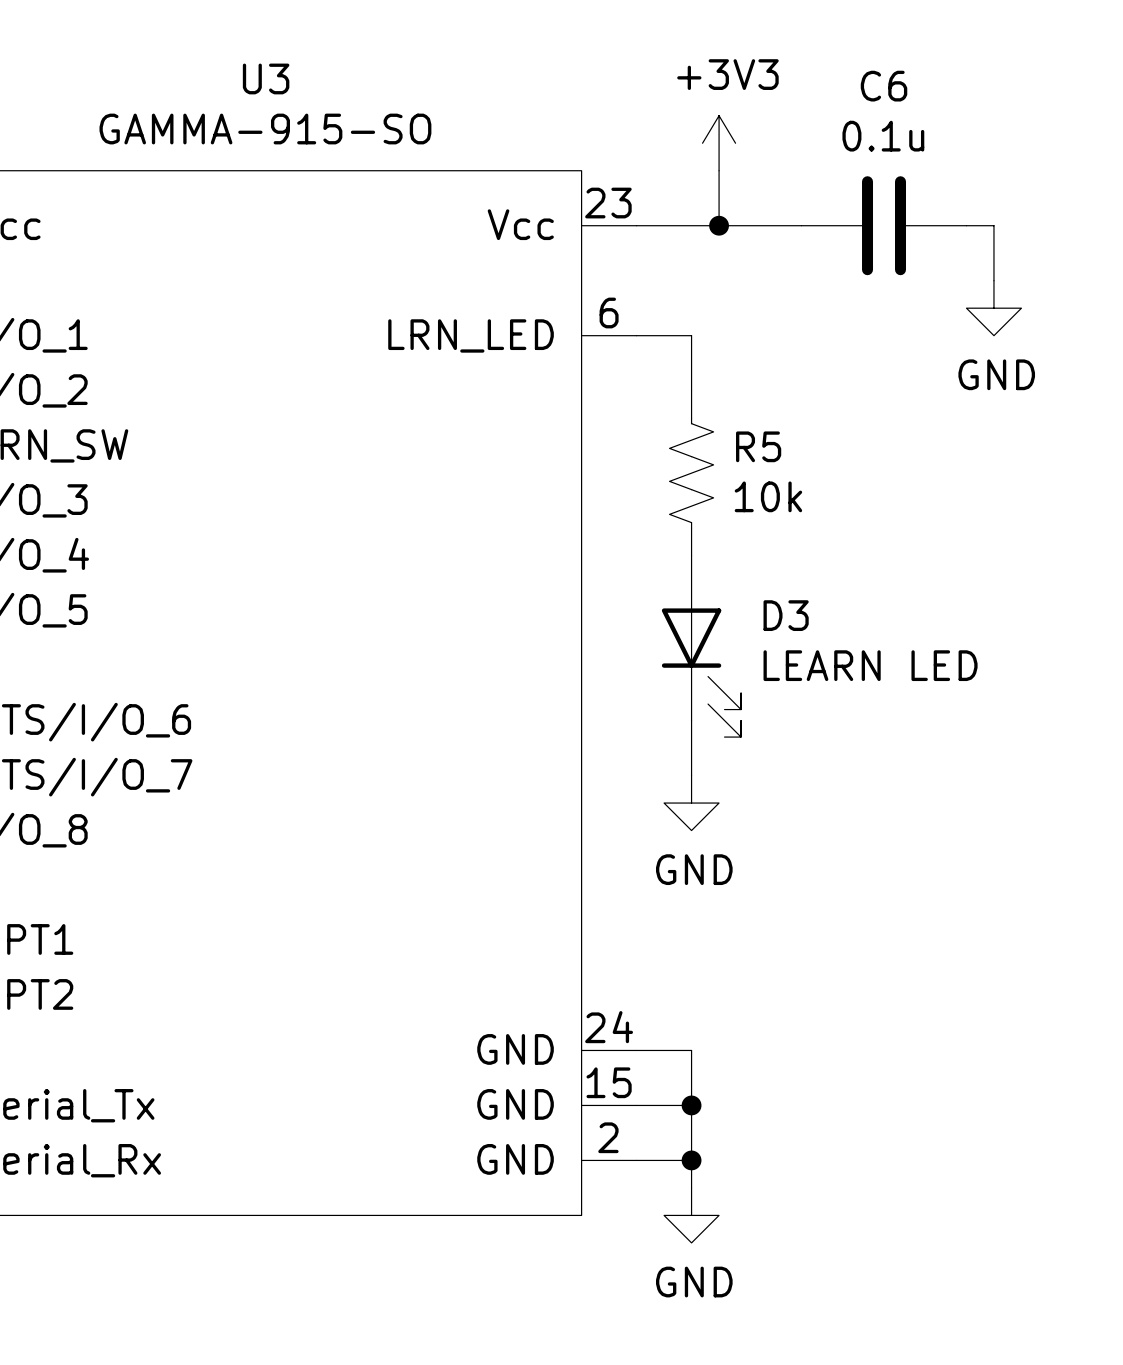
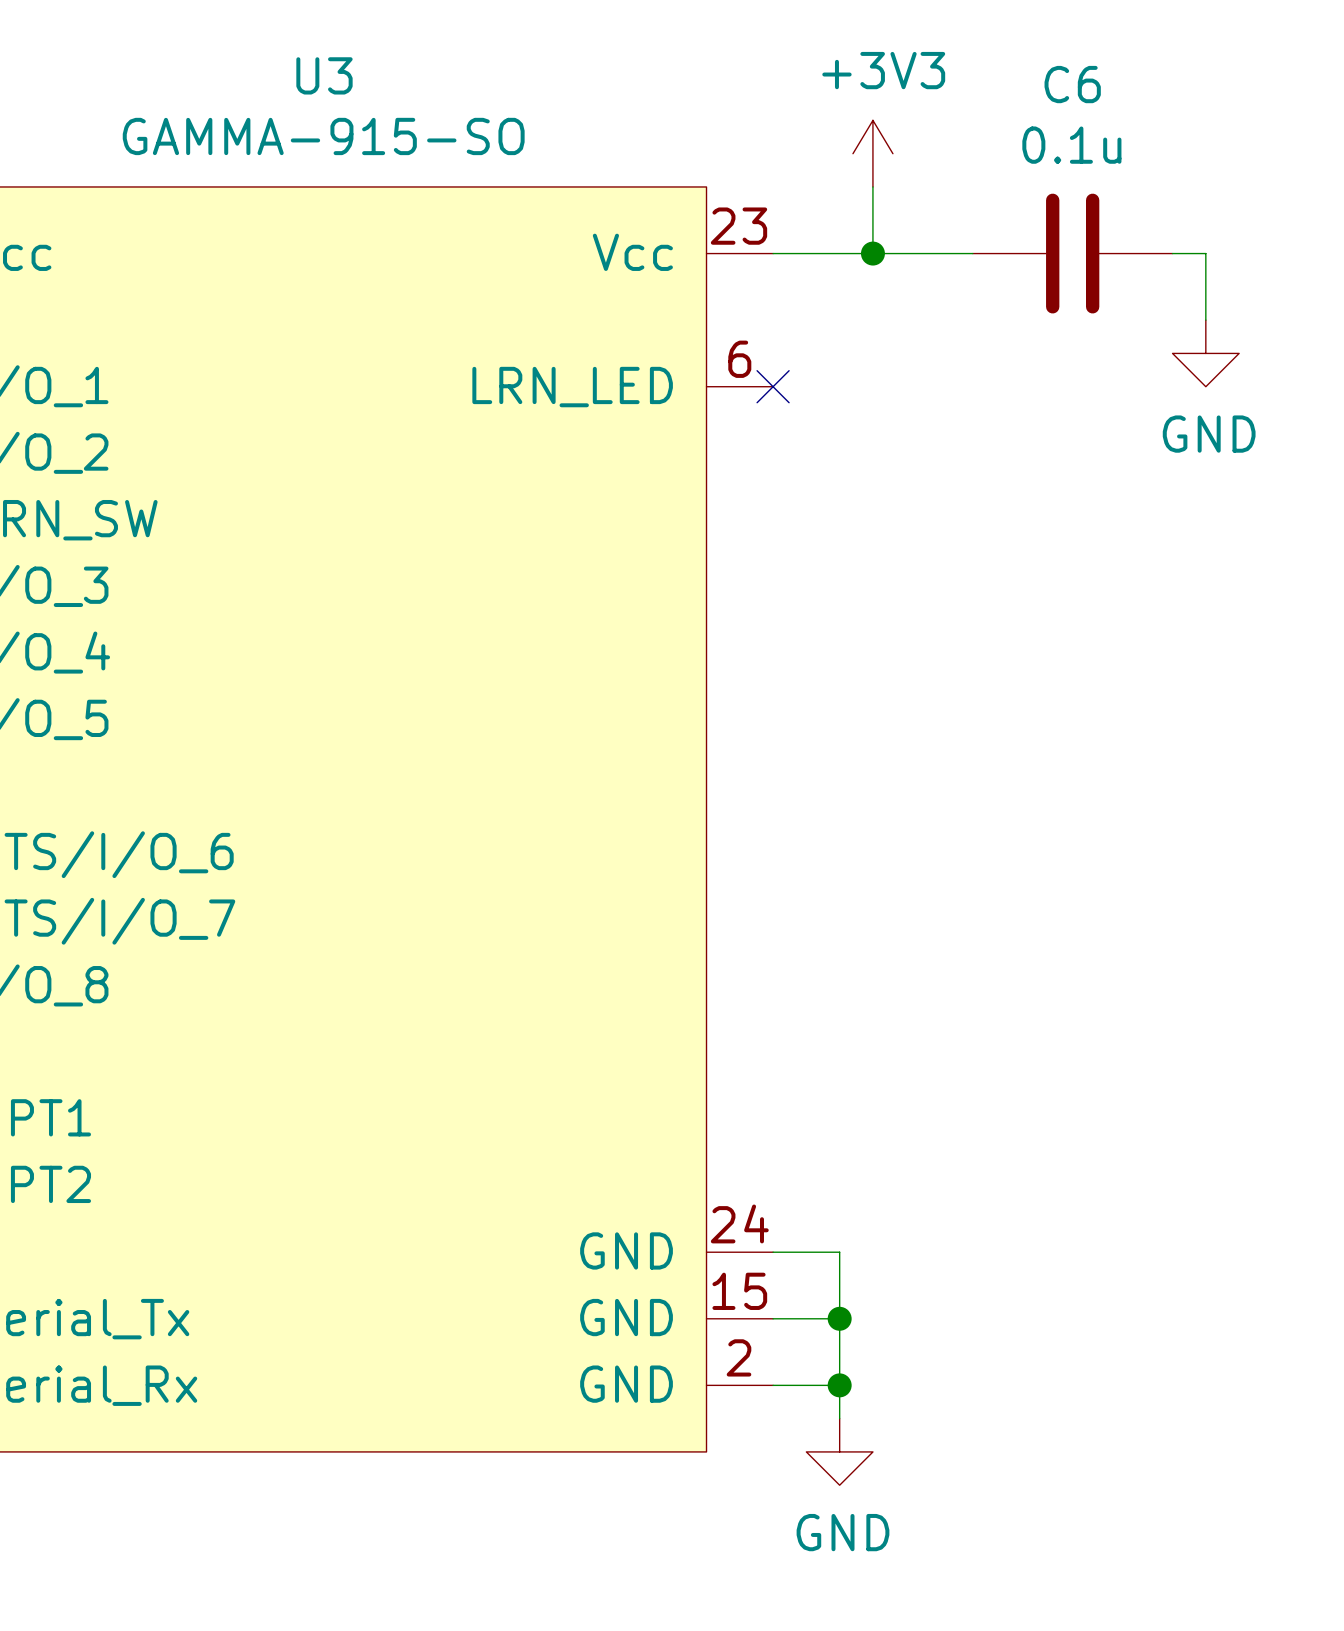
wire: (636, 335) (691, 335) (691, 390) -> none
no-connect mark: none -> (773, 386)
R5: 10k (691, 473) -> none
D3: LEARN LED (701, 646) -> none
wire: (691, 720) (691, 775) -> none
power symbol: GND (691, 803) -> none

